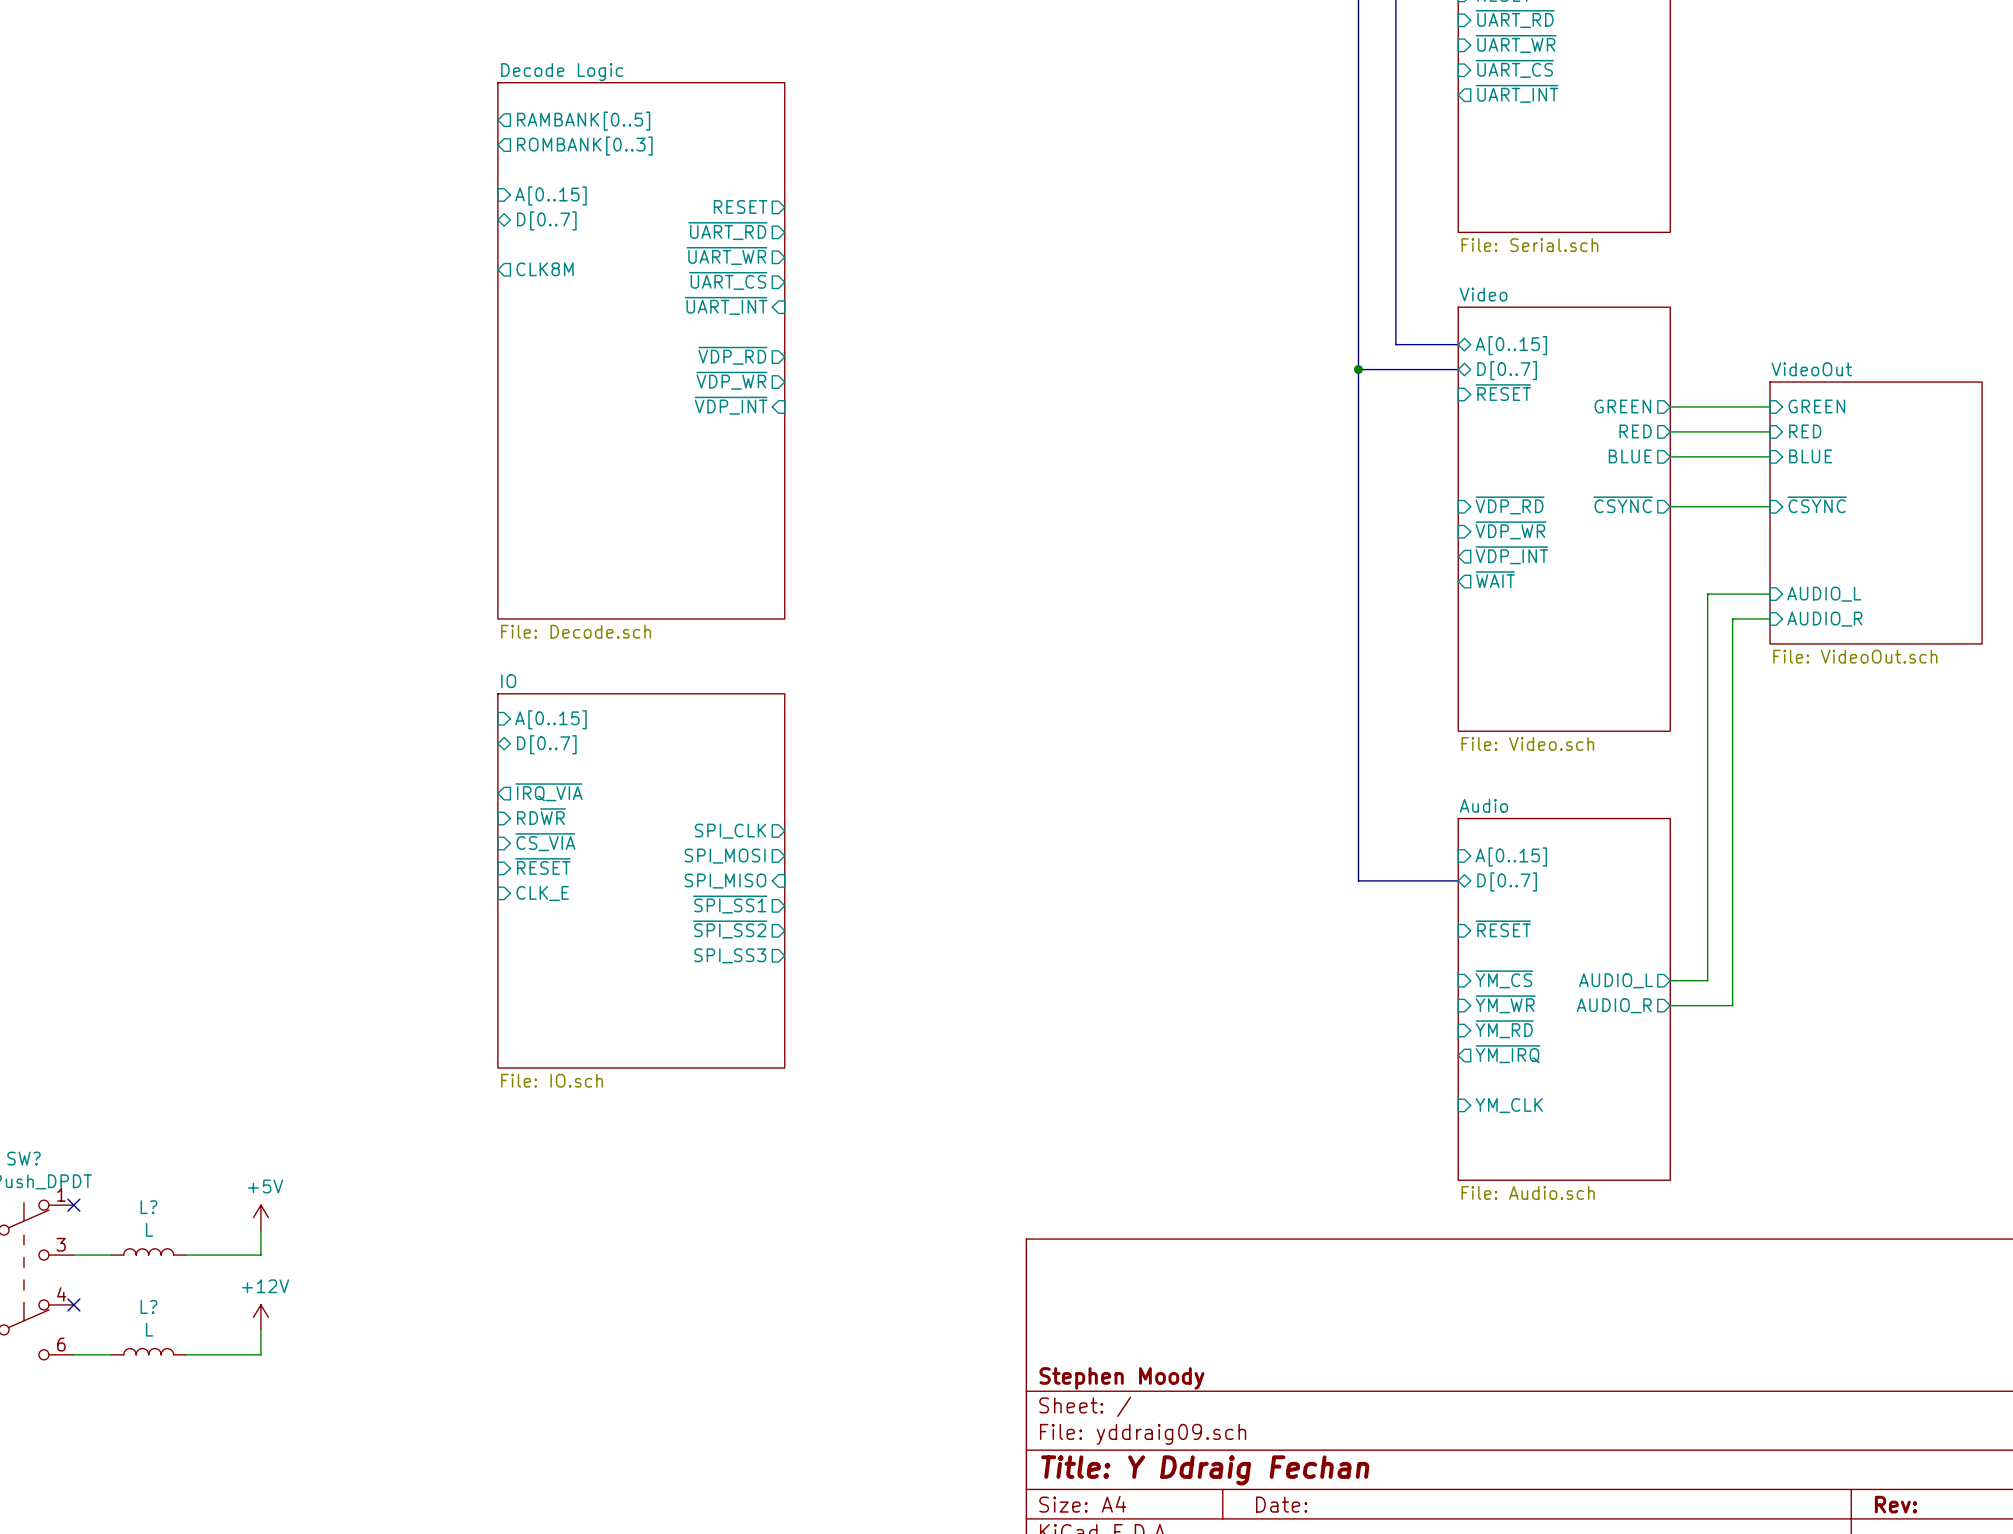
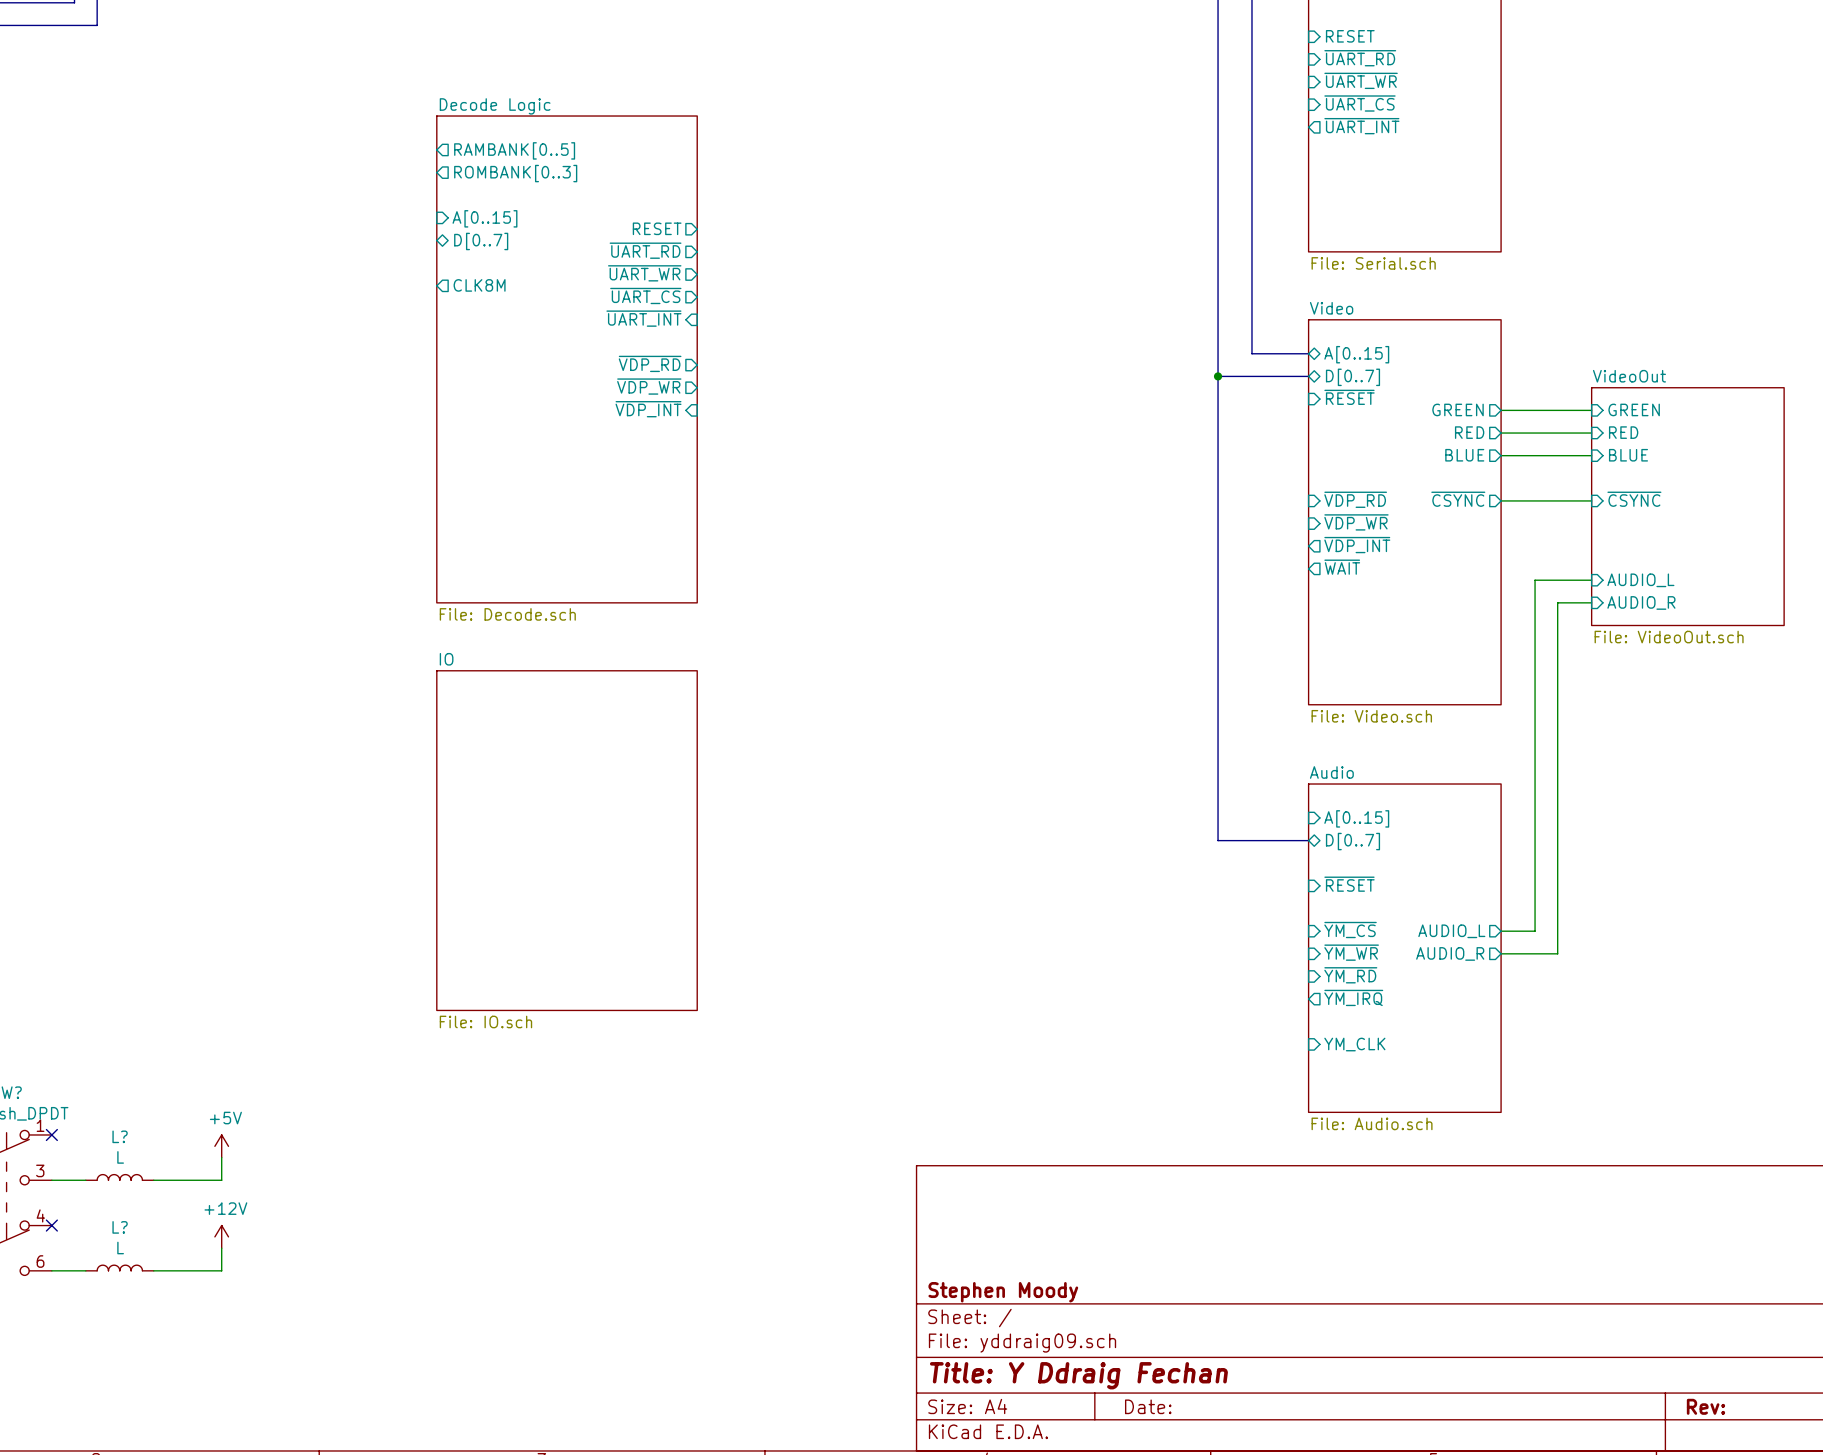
sheet pin: A[0..15] (550, 719) -> none
sheet pin: D[0..7] (546, 744) -> none
sheet pin: ~{IRQ_VIA} (548, 792) -> none
sheet pin: RD~{WR} (541, 816) -> none
sheet pin: SPI_CLK (730, 831) -> none
sheet pin: ~{CS_VIA} (545, 842) -> none
sheet pin: SPI_MOSI (725, 856) -> none
sheet pin: ~{RESET} (542, 866) -> none
sheet pin: SPI_MISO (725, 881) -> none
sheet pin: CLK_E (542, 893) -> none
sheet pin: ~{SPI_SS1} (730, 904) -> none
sheet pin: ~{SPI_SS2} (730, 929) -> none
sheet pin: SPI_SS3 (730, 955) -> none

